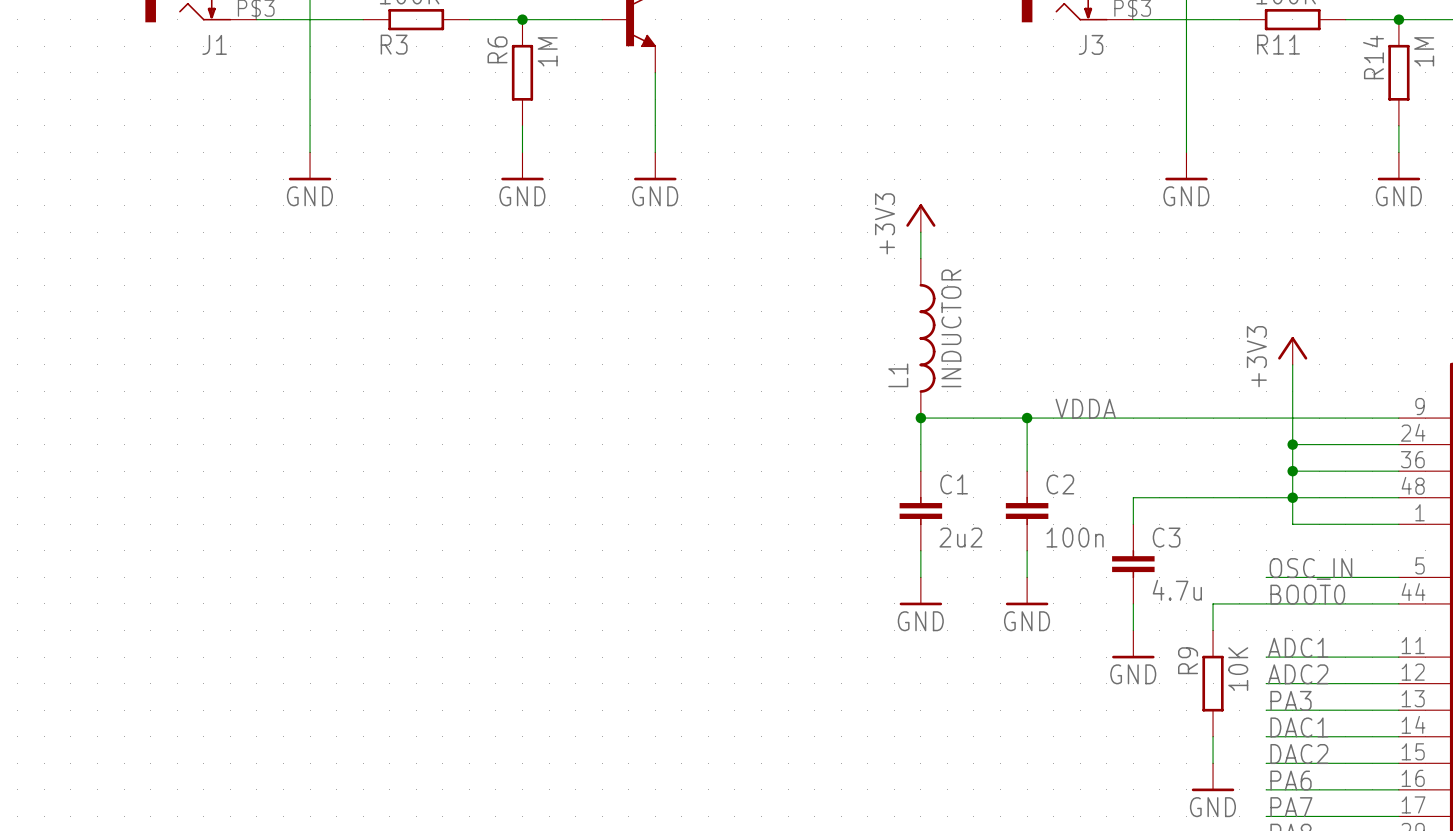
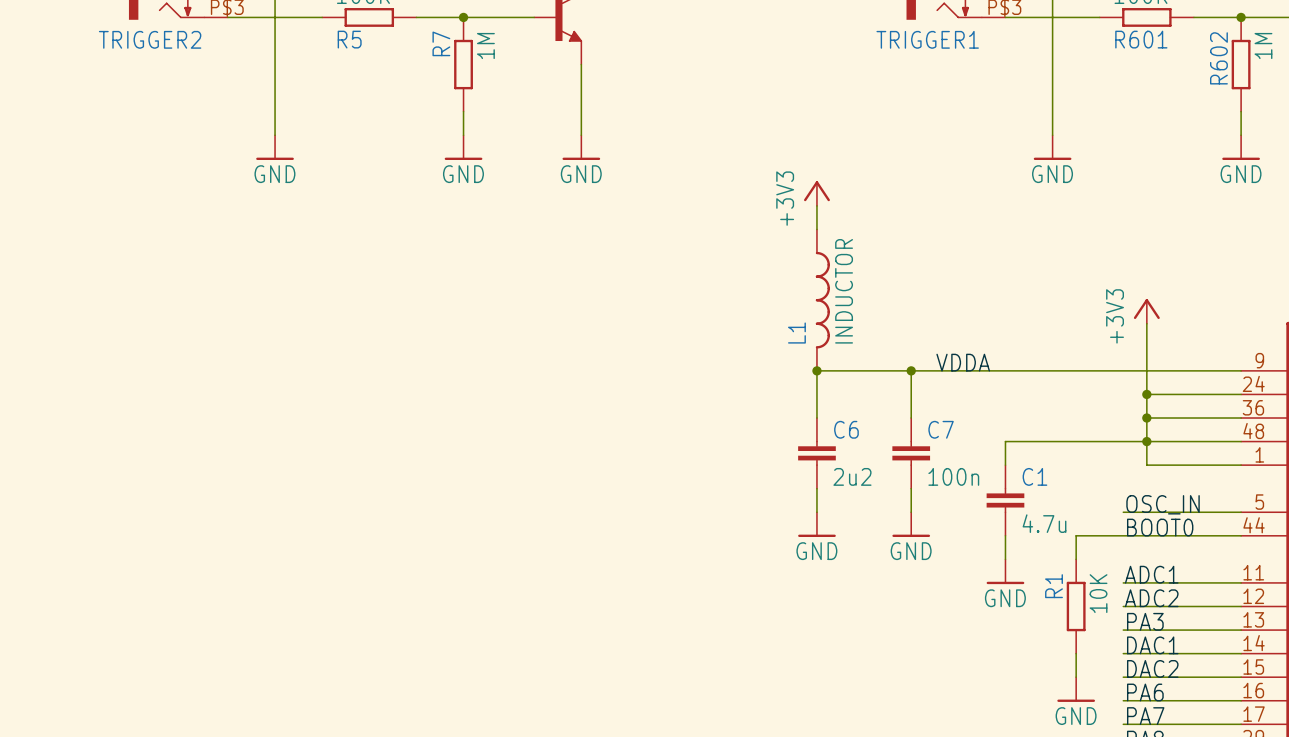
J1 name: J1 (214, 44) -> TRIGGER2 (150, 39)
R3 name: R3 (394, 44) -> R5 (349, 39)
J3 name: J3 (1091, 44) -> TRIGGER1 (927, 39)
R11 name: R11 (1278, 44) -> R601 (1141, 39)
R6 name: R6 (497, 49) -> R7 (441, 43)
R14 name: R14 (1373, 57) -> R602 (1218, 58)
C1 name: C1 (954, 484) -> C6 (846, 429)
C2 name: C2 (1060, 484) -> C7 (941, 429)
C3 name: C3 (1166, 537) -> C1 (1034, 476)
R9 name: R9 (1188, 660) -> R1 (1054, 586)

